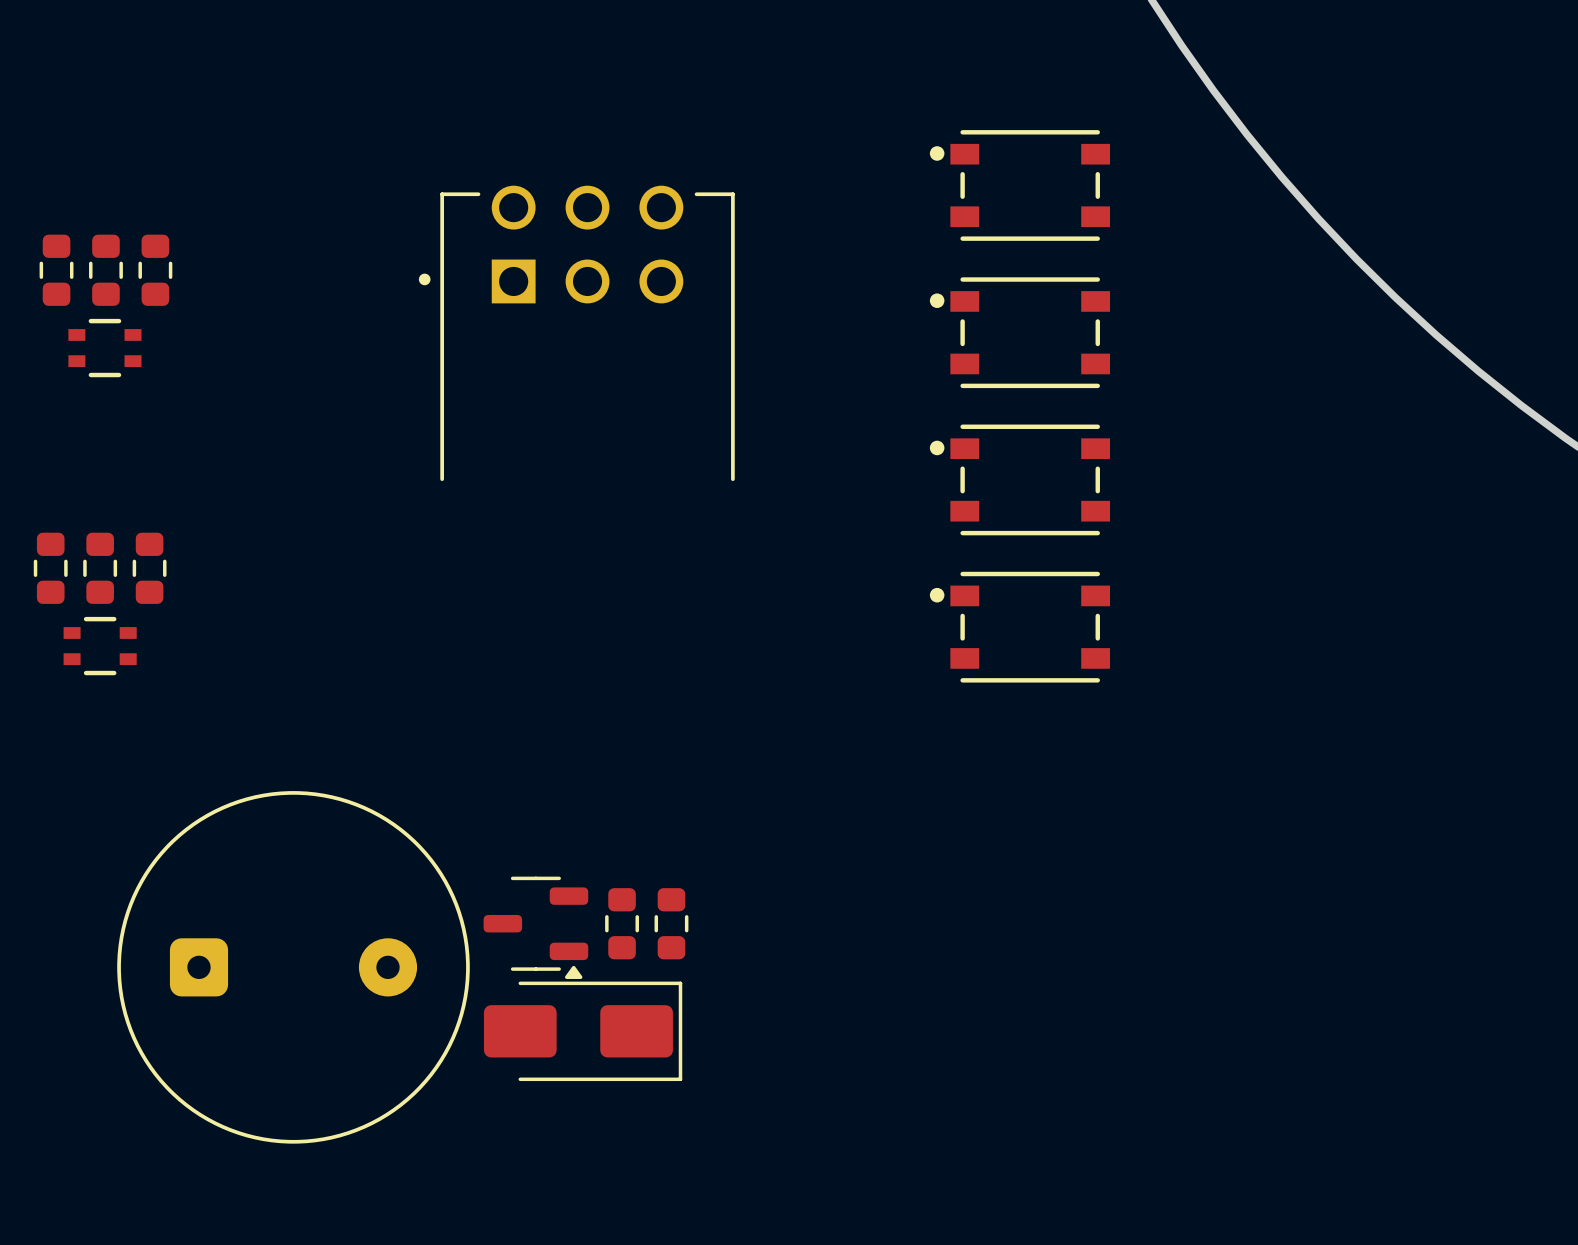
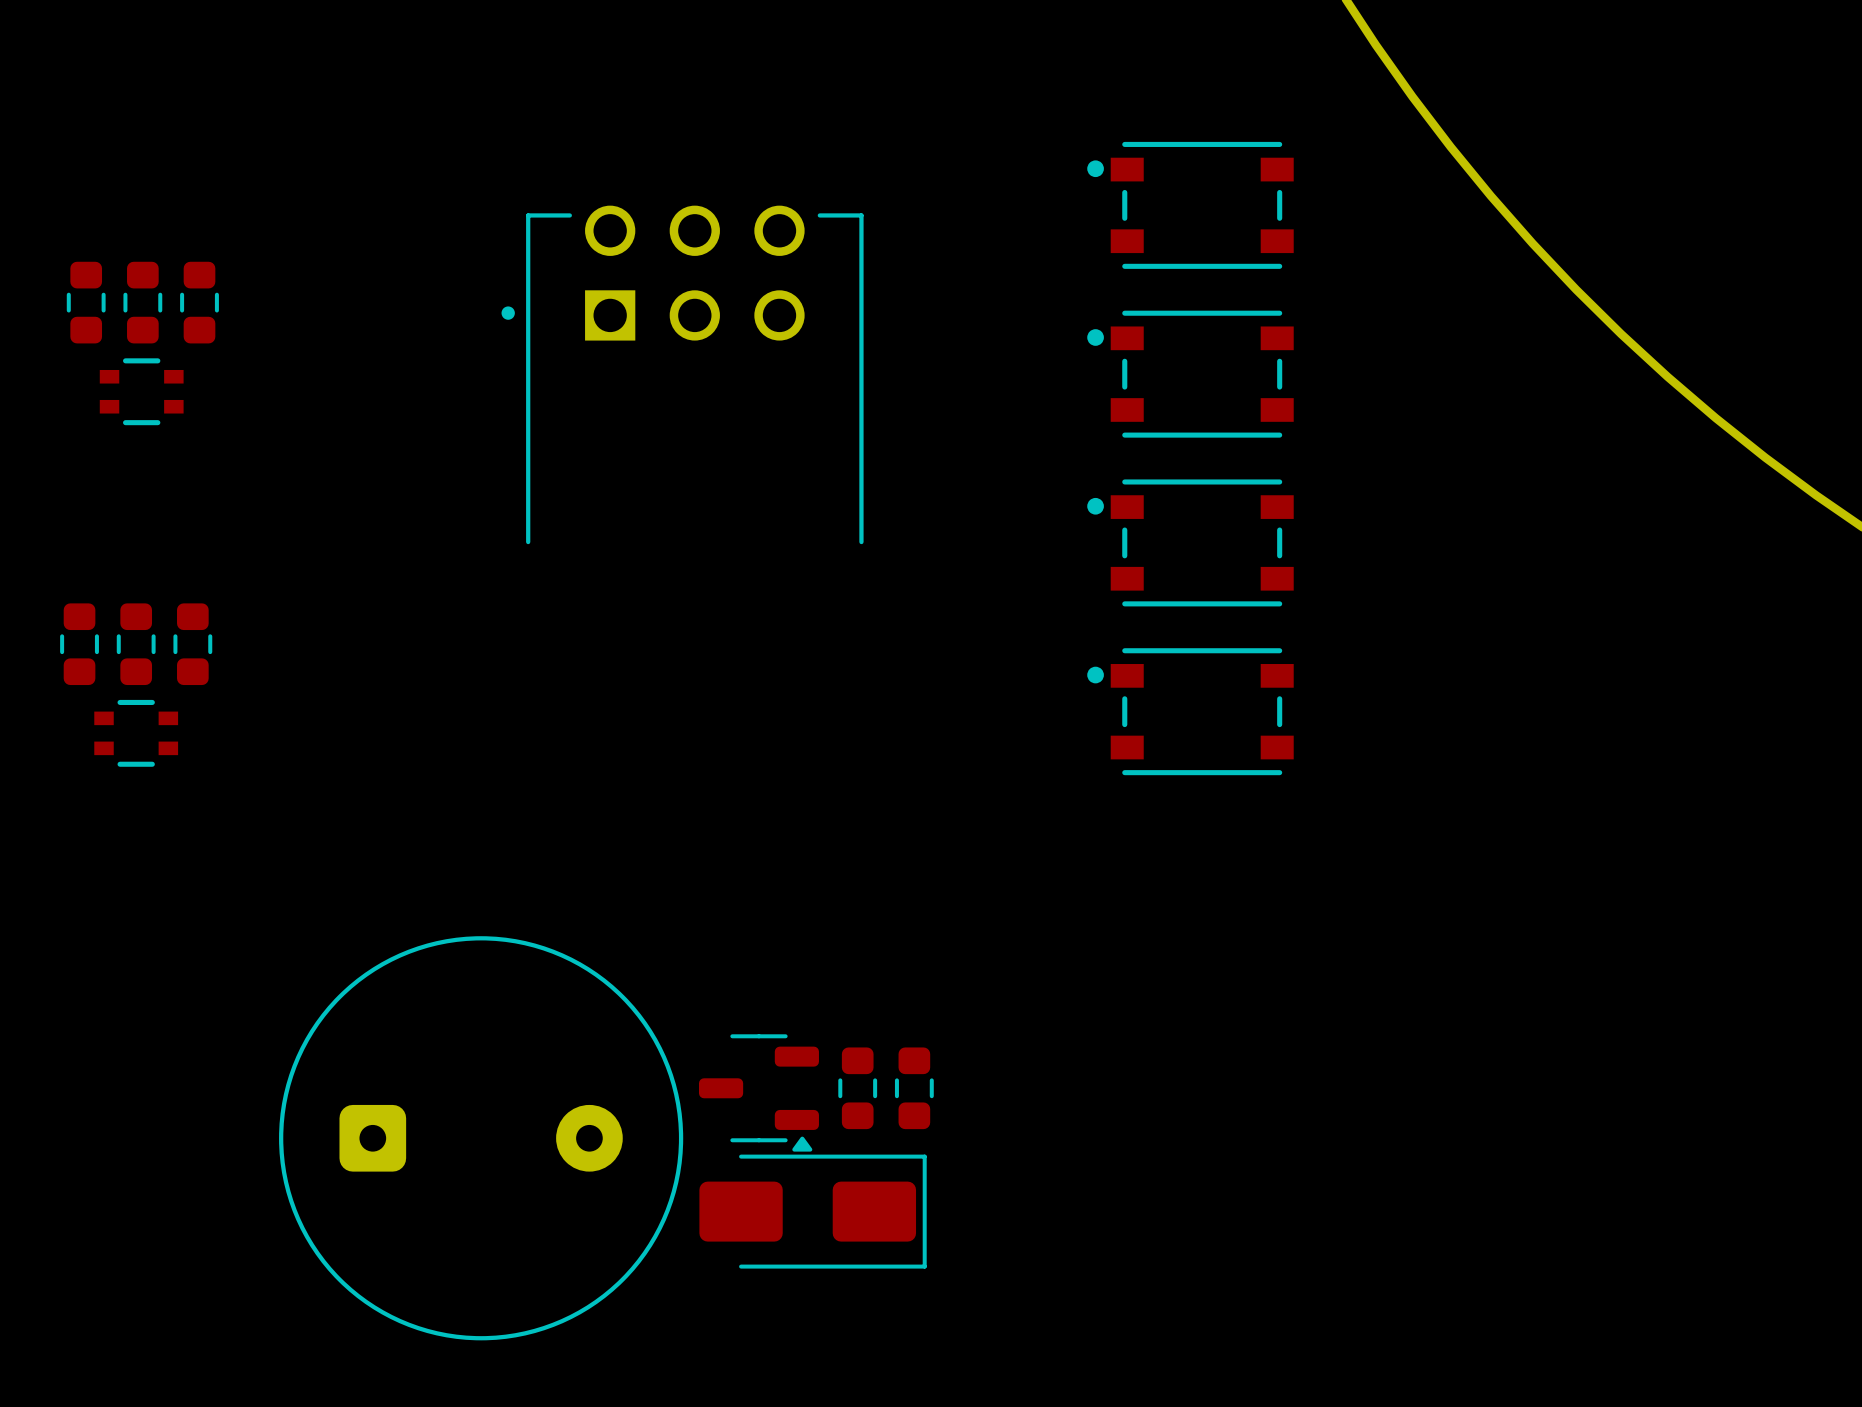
part: (622, 923) -> none
part: (671, 923) -> none
part position: (535, 927) -> (758, 1092)
part: none -> (857, 1088)
part: none -> (914, 1088)
part position: (293, 967) -> (481, 1138)
part position: (583, 1031) -> (813, 1211)

